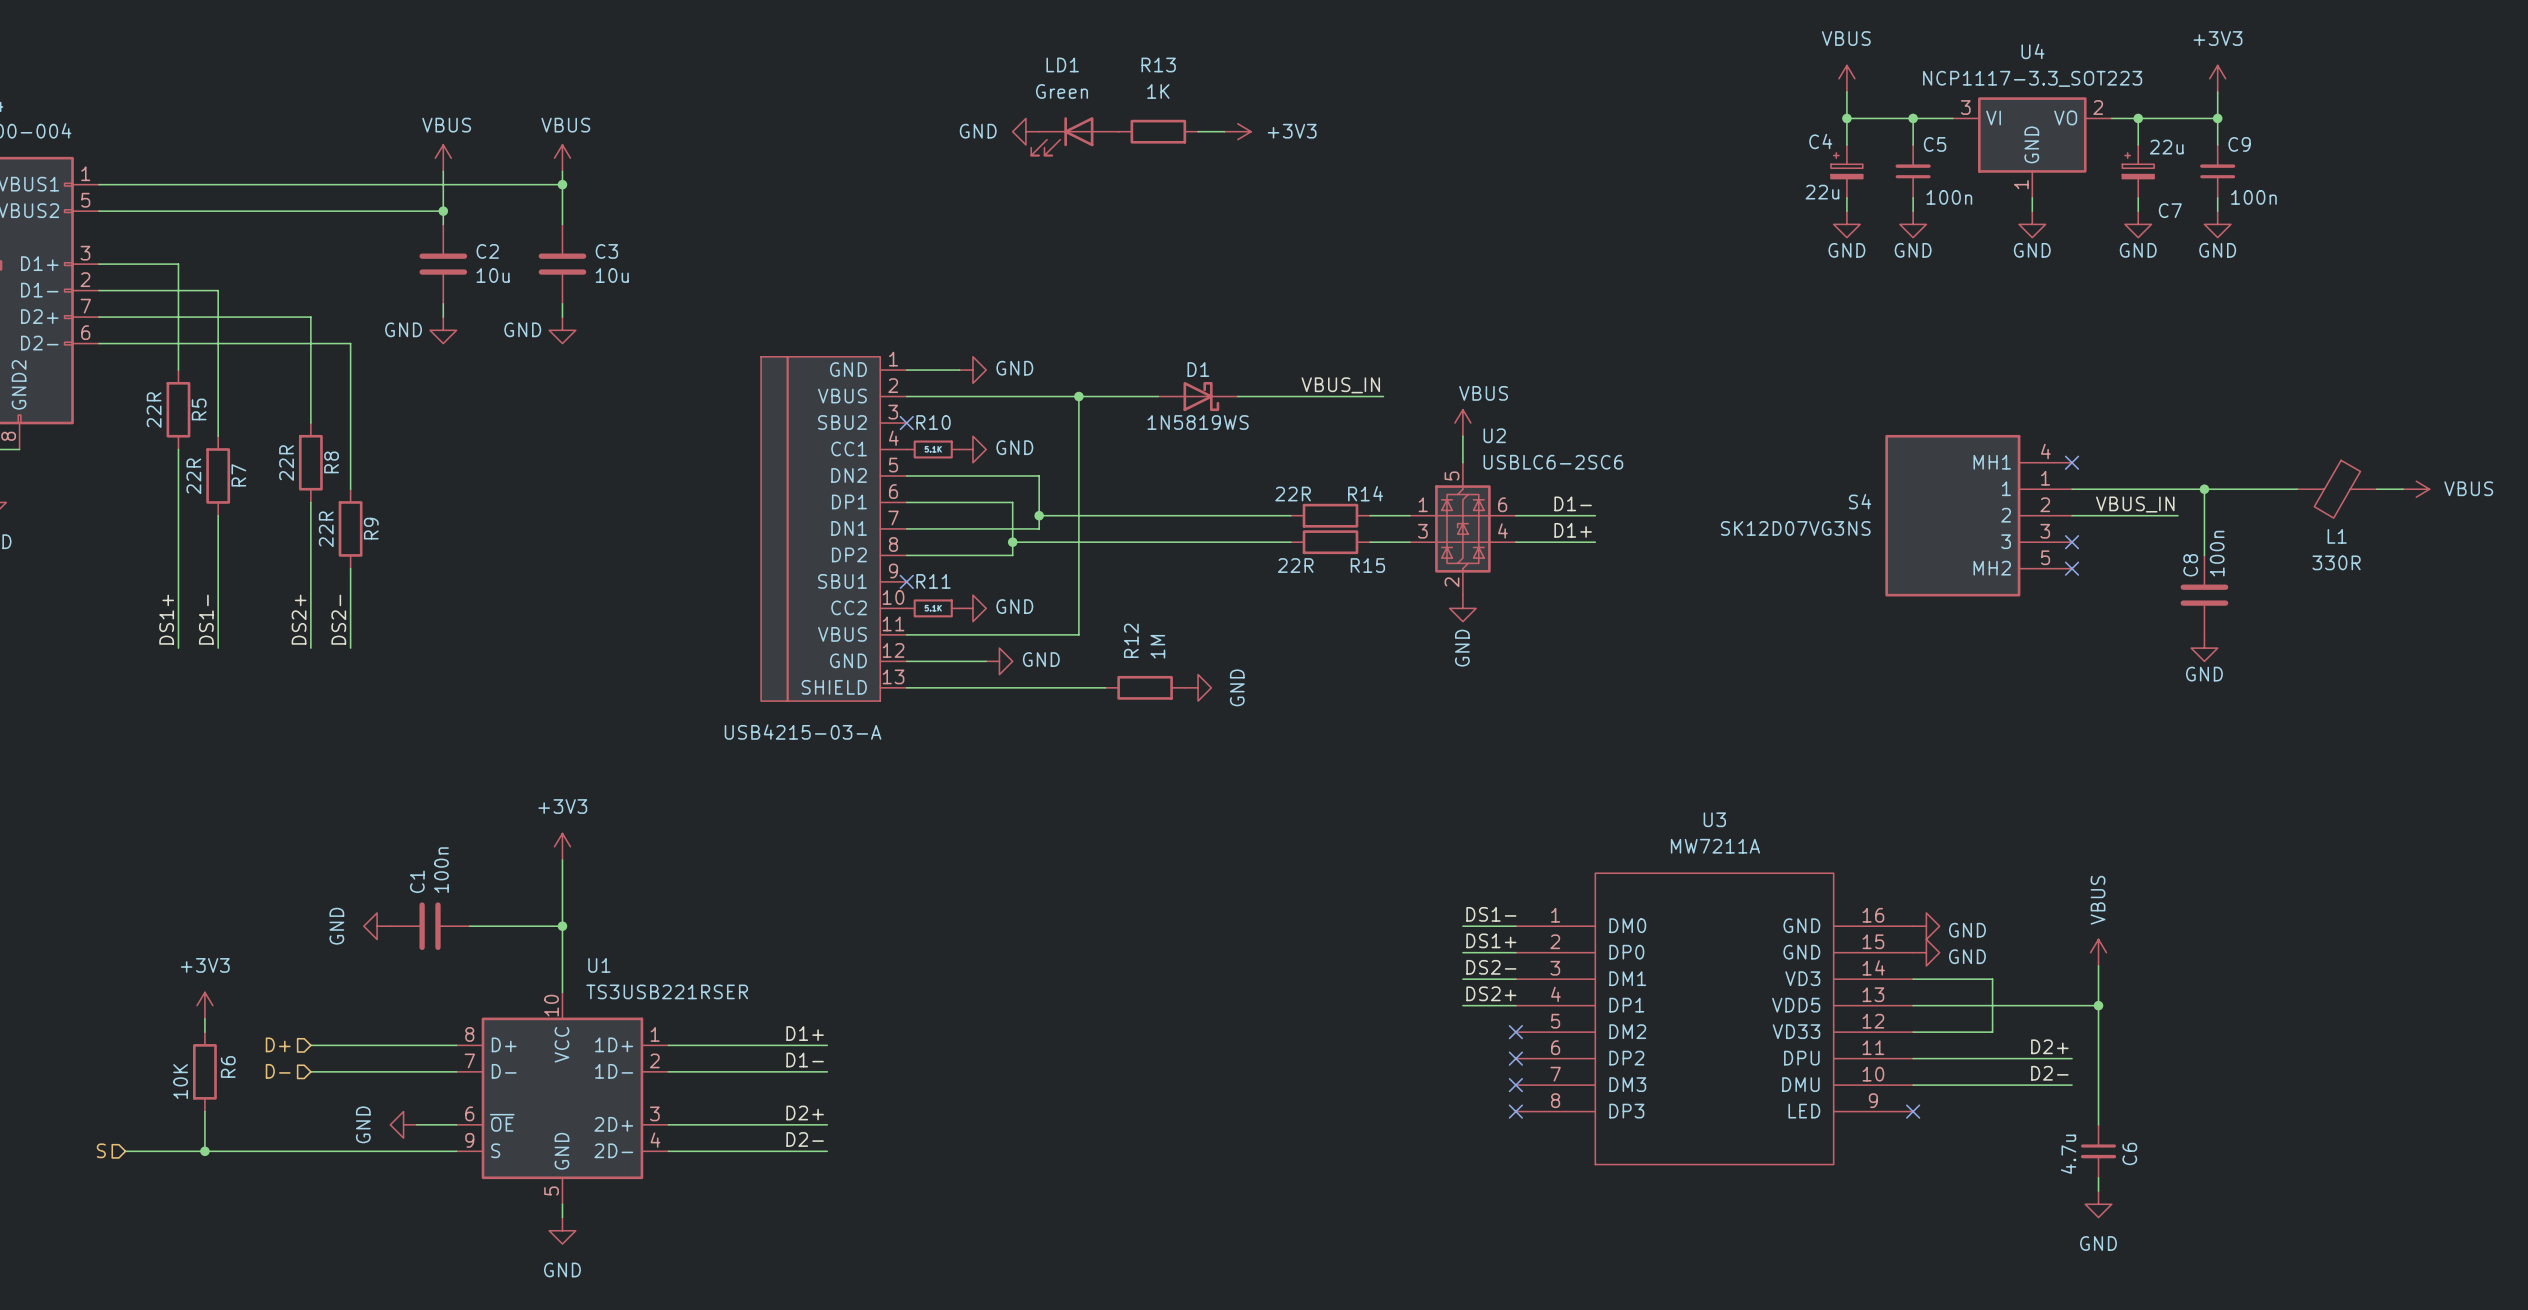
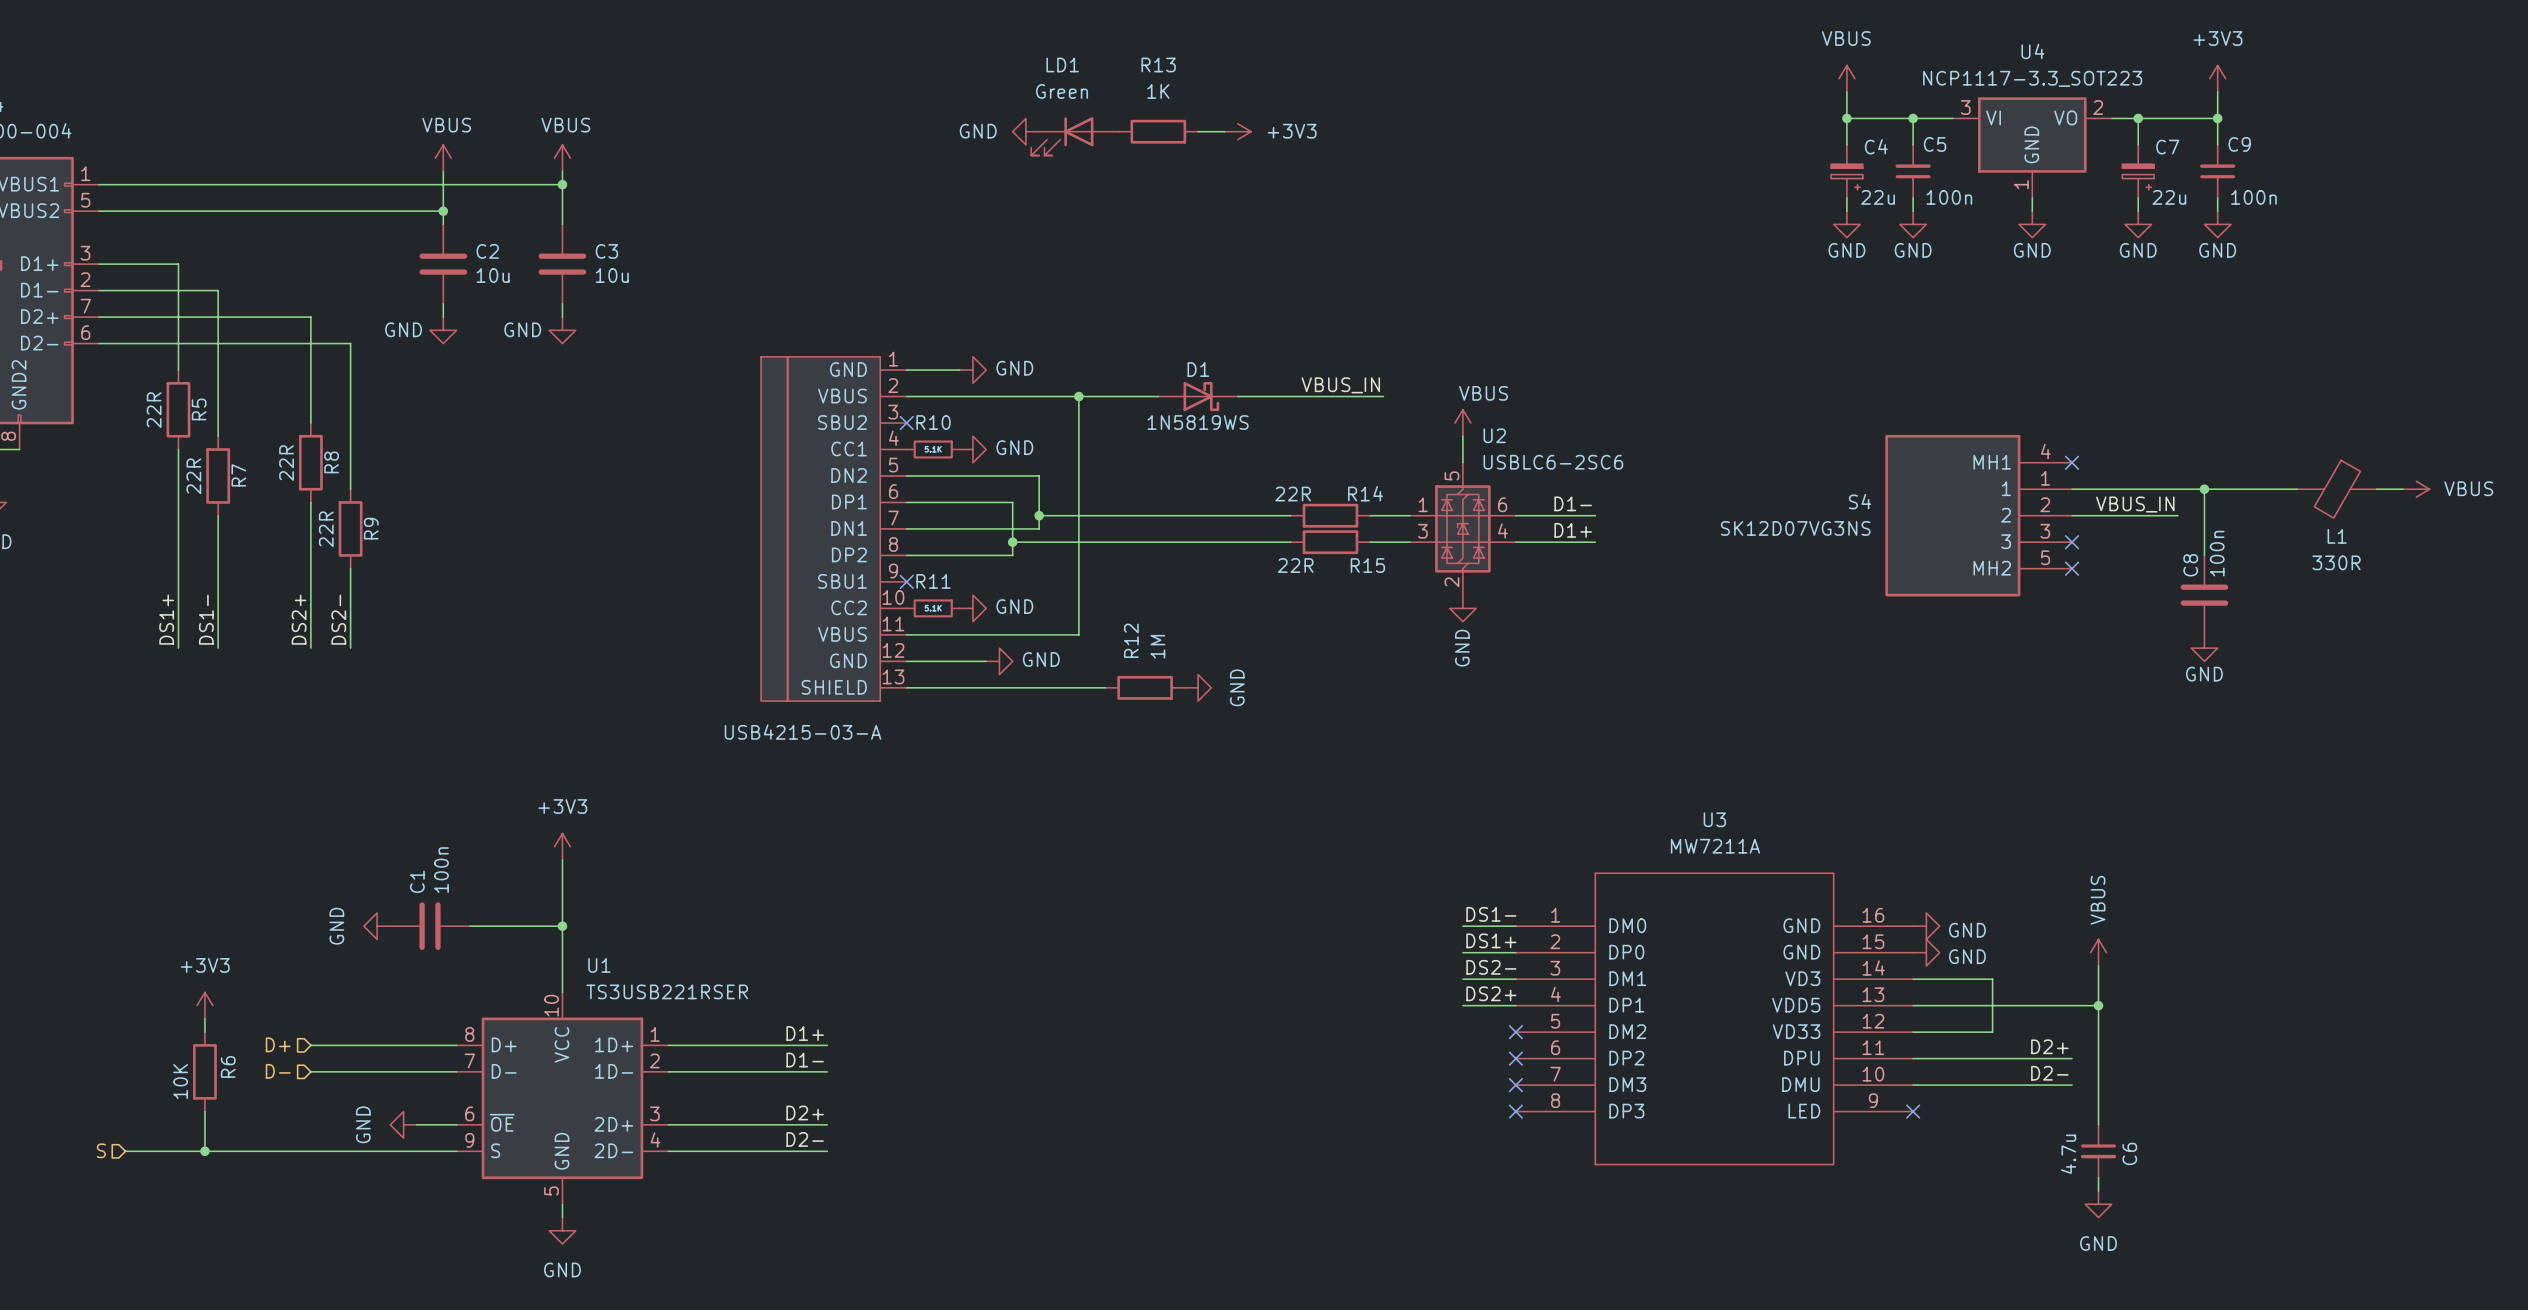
C4 name position: C4 (1820, 141) -> C4 (1876, 146)
C7 value position: 22u (2166, 147) -> 22u (2169, 197)
C4 rotation: 0° (1846, 165) -> 180° (1846, 177)
C7 rotation: 0° (2138, 165) -> 180° (2138, 177)
C4 value position: 22u (1822, 192) -> 22u (1878, 197)
C7 name position: C7 (2170, 210) -> C7 (2167, 147)

